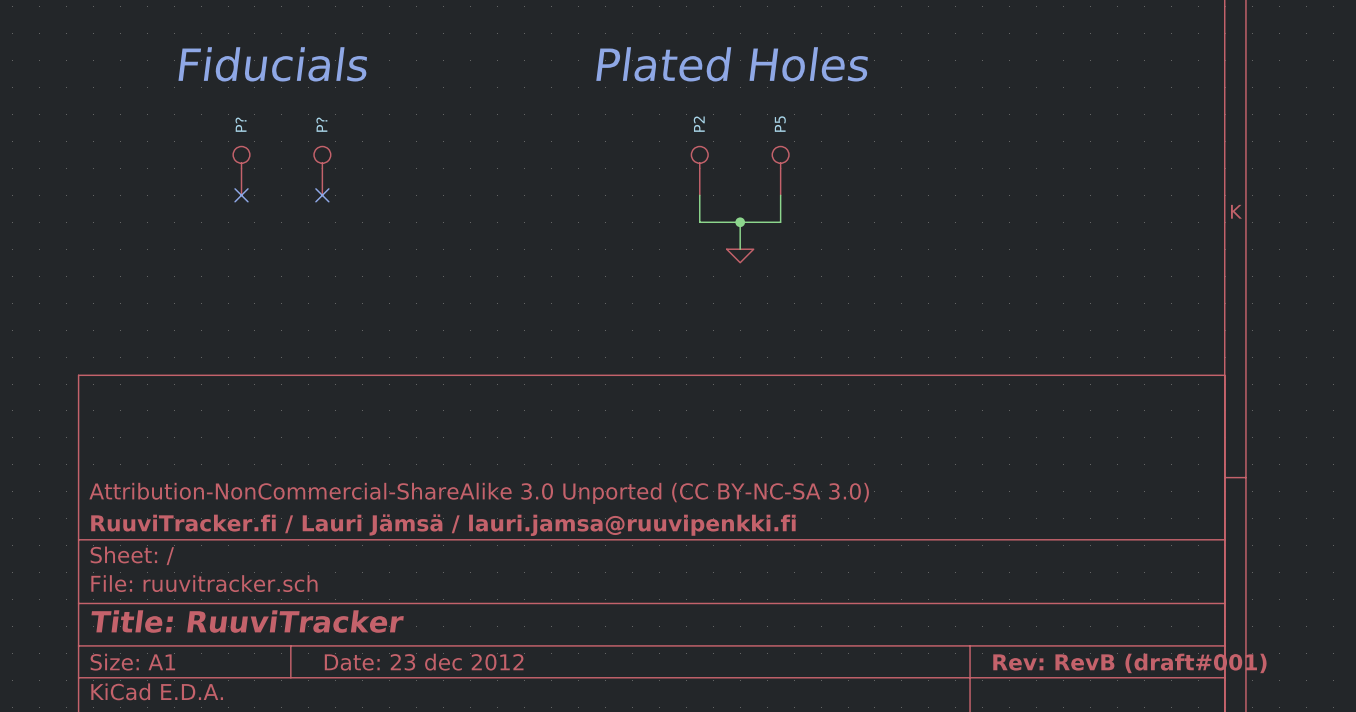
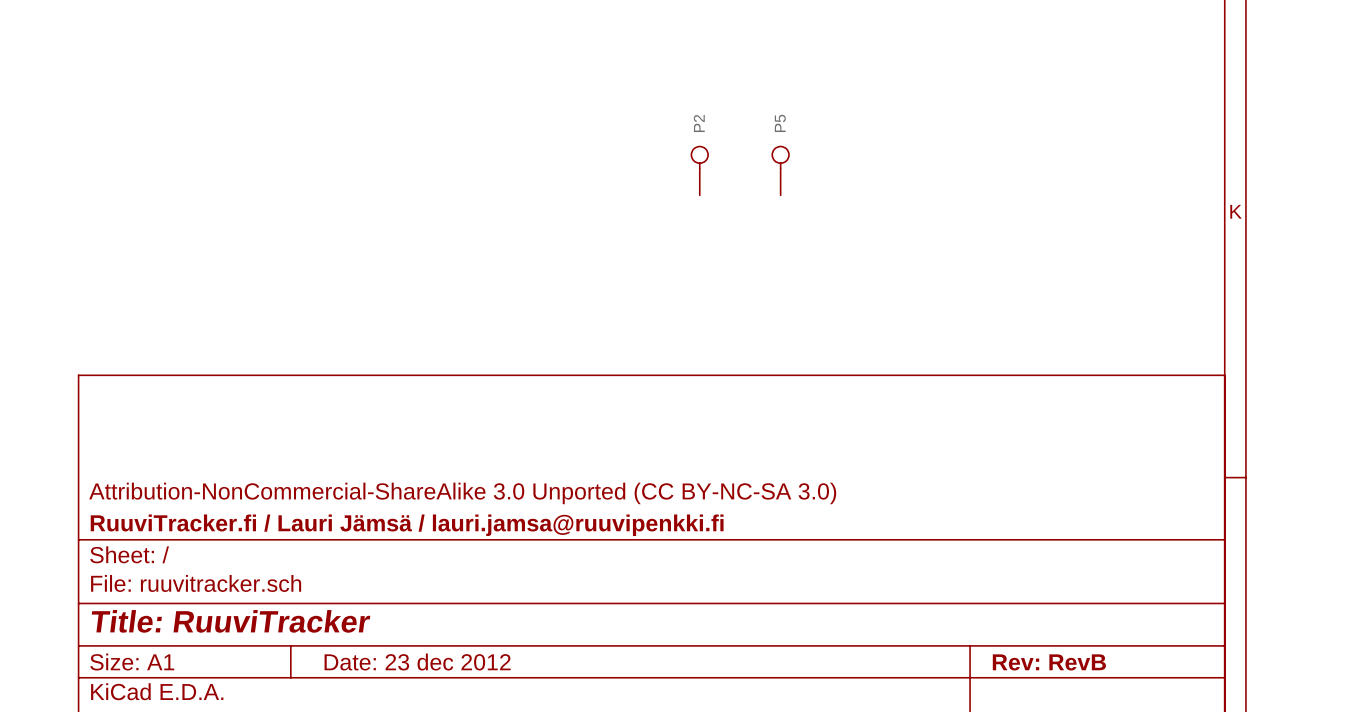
text: Fiducials (272, 64) -> none
text: Plated Holes (732, 64) -> none
P?: (241, 170) -> none
P?: (322, 170) -> none
no-connect mark: (241, 195) -> none
no-connect mark: (322, 195) -> none
wire: (699, 195) (699, 222) (780, 222) (780, 195) -> none
wire: (740, 222) (740, 249) -> none
junction: (740, 222) -> none
power symbol: (740, 255) -> none
title block: Rev: RevB (draft#001) (1129, 663) -> Rev: RevB (1049, 662)

